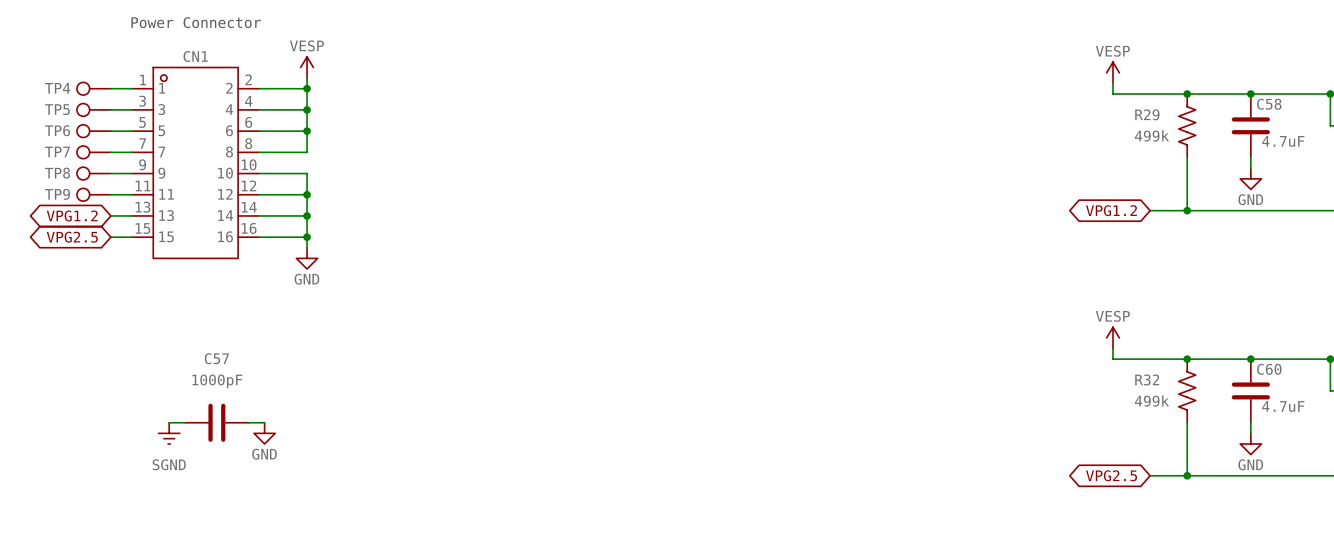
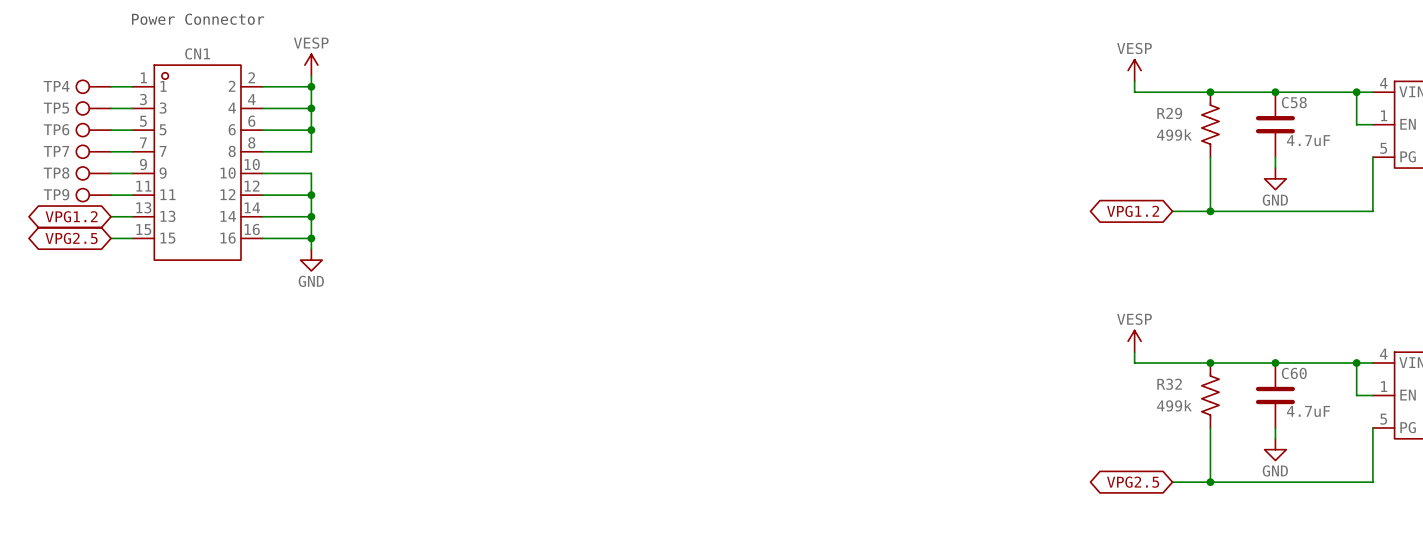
wire: (169, 422) (185, 422) -> none
C57: 1000pF (216, 422) -> none
wire: (248, 422) (264, 422) -> none
power symbol: SGND (169, 433) -> none
power symbol: GND (264, 433) -> none

